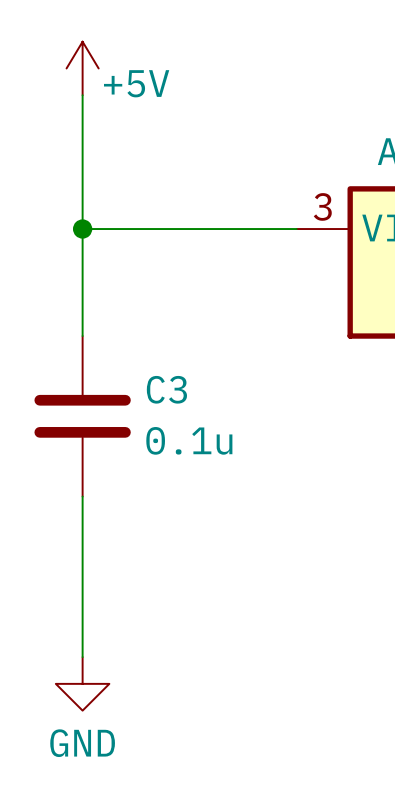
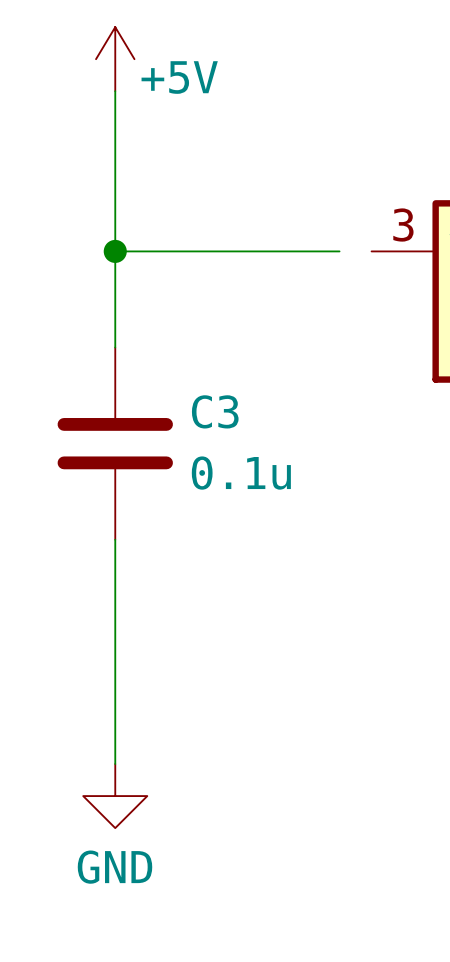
wire: (269, 229) (296, 229) -> none
C3 position: (82, 416) -> (115, 443)

